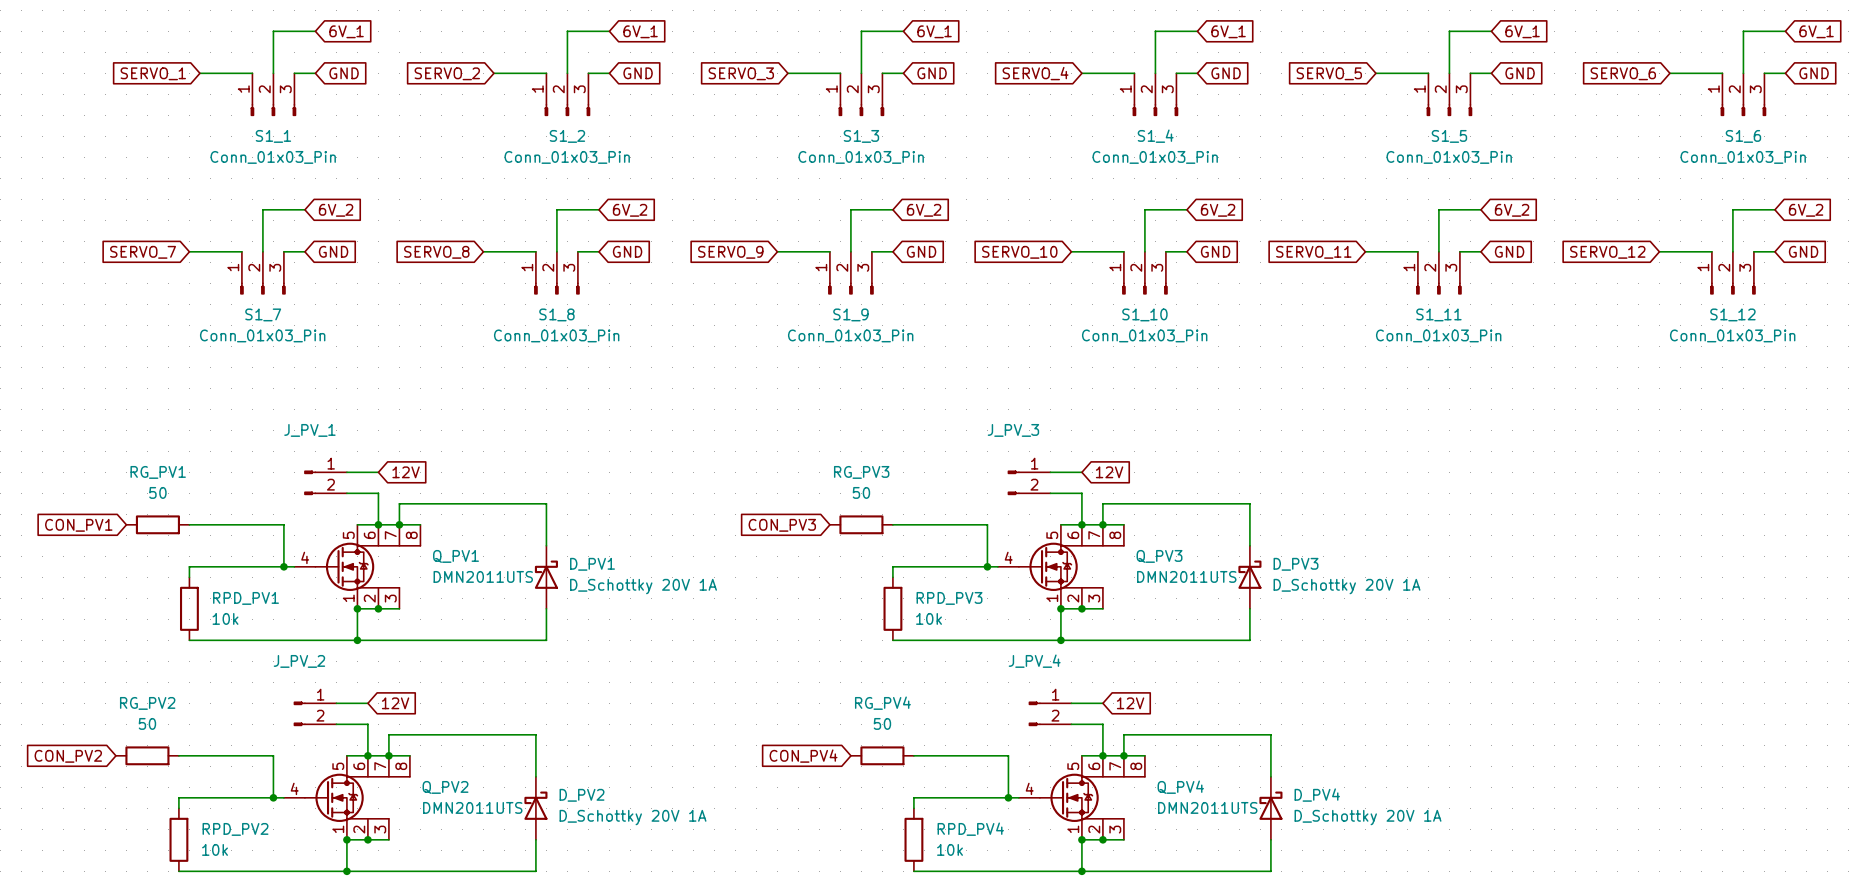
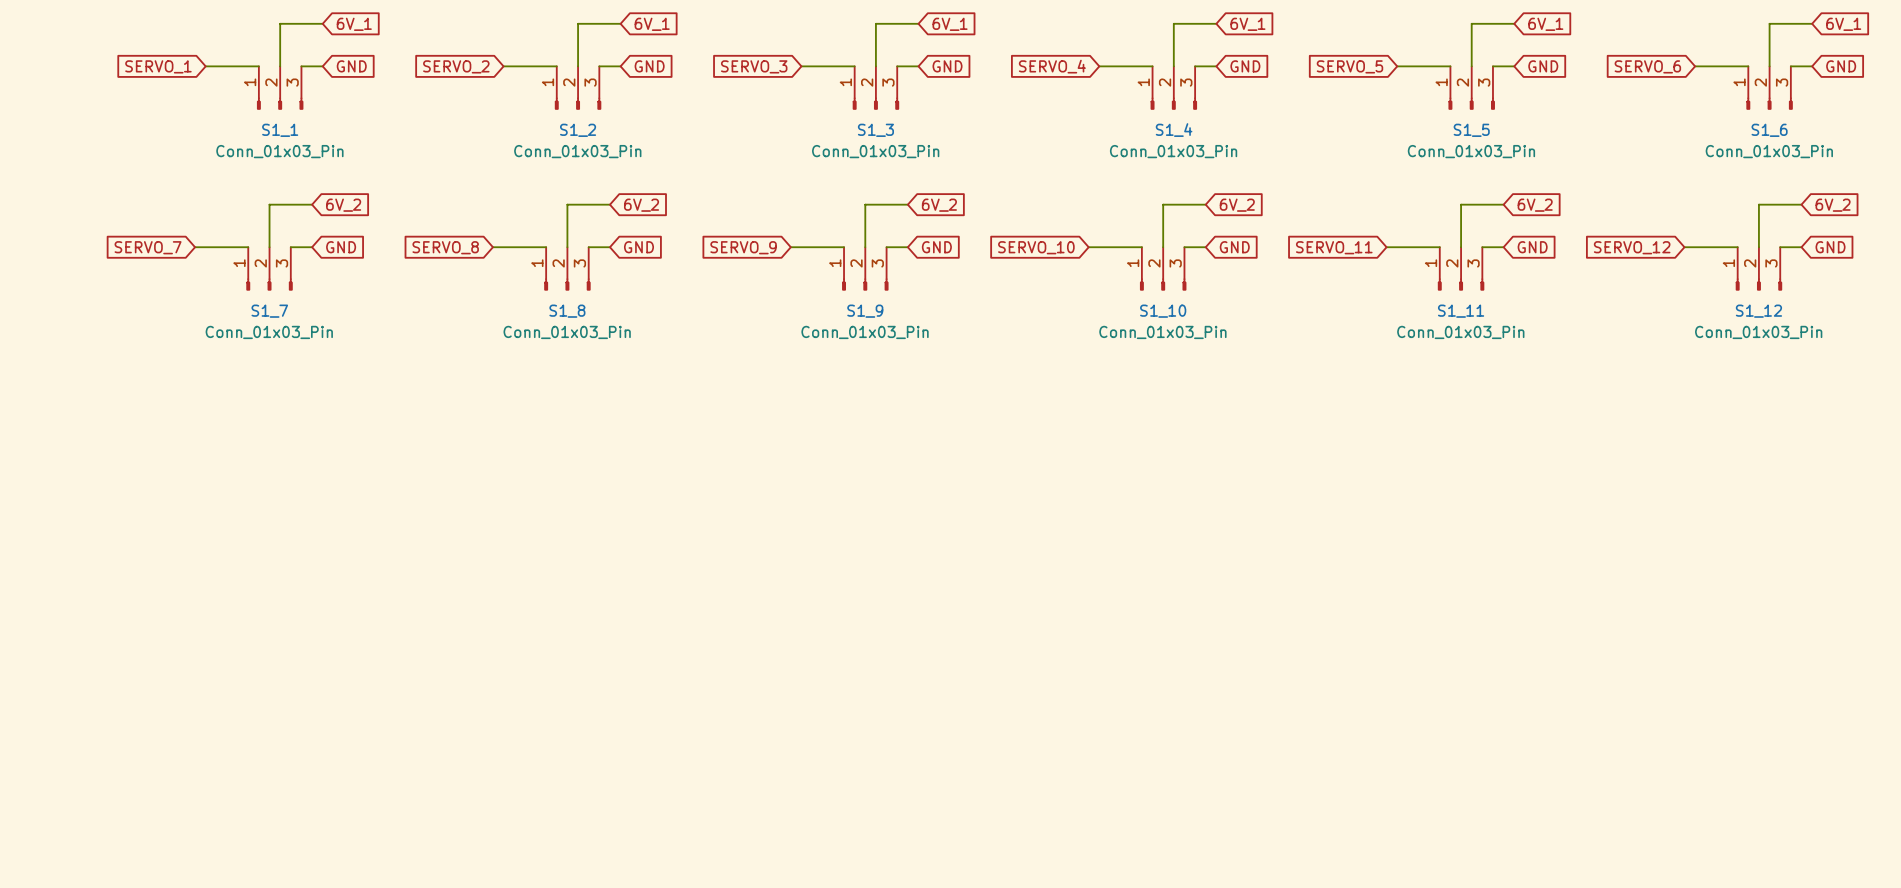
wire: (346, 472) (378, 472) -> none
global label: 12V (406, 472) -> none
wire: (1050, 472) (1081, 472) -> none
global label: 12V (1109, 472) -> none
J_PV_1: (325, 482) -> none
J_PV_3: (1029, 482) -> none
wire: (346, 493) (378, 493) (378, 524) -> none
wire: (1050, 493) (1081, 493) (1081, 524) -> none
RG_PV1: 50 (157, 524) -> none
wire: (189, 524) (283, 524) (283, 566) -> none
wire: (357, 524) (420, 524) -> none
junction: (378, 524) -> none
wire: (399, 524) (399, 503) (546, 503) (546, 545) -> none
junction: (399, 524) -> none
RG_PV3: 50 (861, 524) -> none
wire: (892, 524) (987, 524) (987, 566) -> none
wire: (1060, 524) (1123, 524) -> none
junction: (1081, 524) -> none
wire: (1102, 524) (1102, 503) (1249, 503) (1249, 545) -> none
junction: (1102, 524) -> none
global label: CON_PV1 (78, 525) -> none
global label: CON_PV3 (782, 525) -> none
junction: (283, 566) -> none
wire: (294, 566) (189, 566) (189, 577) -> none
Q_PV1: DMN2011UTS (357, 566) -> none
junction: (987, 566) -> none
wire: (997, 566) (892, 566) (892, 577) -> none
Q_PV3: DMN2011UTS (1060, 566) -> none
D_PV1: D_Schottky 20V 1A (546, 577) -> none
D_PV3: D_Schottky 20V 1A (1249, 577) -> none
RPD_PV1: 10k (189, 608) -> none
junction: (357, 608) -> none
junction: (378, 608) -> none
wire: (399, 608) (357, 608) (357, 640) -> none
wire: (546, 608) (546, 640) (189, 640) -> none
RPD_PV3: 10k (892, 608) -> none
junction: (1060, 608) -> none
junction: (1081, 608) -> none
wire: (1102, 608) (1060, 608) (1060, 640) -> none
wire: (1249, 608) (1249, 640) (892, 640) -> none
junction: (357, 640) -> none
junction: (1060, 640) -> none
wire: (336, 703) (367, 703) -> none
global label: 12V (395, 703) -> none
wire: (1071, 703) (1102, 703) -> none
global label: 12V (1130, 703) -> none
J_PV_2: (315, 713) -> none
J_PV_4: (1050, 713) -> none
wire: (336, 724) (367, 724) (367, 755) -> none
wire: (1071, 724) (1102, 724) (1102, 755) -> none
RG_PV2: 50 (147, 755) -> none
wire: (178, 755) (273, 755) (273, 797) -> none
wire: (346, 755) (409, 755) -> none
junction: (367, 755) -> none
wire: (388, 755) (388, 734) (535, 734) (535, 776) -> none
junction: (388, 755) -> none
RG_PV4: 50 (882, 755) -> none
wire: (913, 755) (1008, 755) (1008, 797) -> none
wire: (1081, 755) (1144, 755) -> none
junction: (1102, 755) -> none
wire: (1123, 755) (1123, 734) (1270, 734) (1270, 776) -> none
junction: (1123, 755) -> none
global label: CON_PV2 (68, 756) -> none
global label: CON_PV4 (803, 756) -> none
junction: (273, 797) -> none
wire: (283, 797) (178, 797) (178, 808) -> none
Q_PV2: DMN2011UTS (346, 797) -> none
junction: (1008, 797) -> none
wire: (1018, 797) (913, 797) (913, 808) -> none
Q_PV4: DMN2011UTS (1081, 797) -> none
D_PV2: D_Schottky 20V 1A (535, 808) -> none
D_PV4: D_Schottky 20V 1A (1270, 808) -> none
RPD_PV2: 10k (178, 839) -> none
junction: (346, 839) -> none
junction: (367, 839) -> none
wire: (388, 839) (346, 839) (346, 871) -> none
wire: (535, 839) (535, 871) (178, 871) -> none
RPD_PV4: 10k (913, 839) -> none
junction: (1081, 839) -> none
junction: (1102, 839) -> none
wire: (1123, 839) (1081, 839) (1081, 871) -> none
wire: (1270, 839) (1270, 871) (913, 871) -> none
junction: (346, 871) -> none
junction: (1081, 871) -> none

